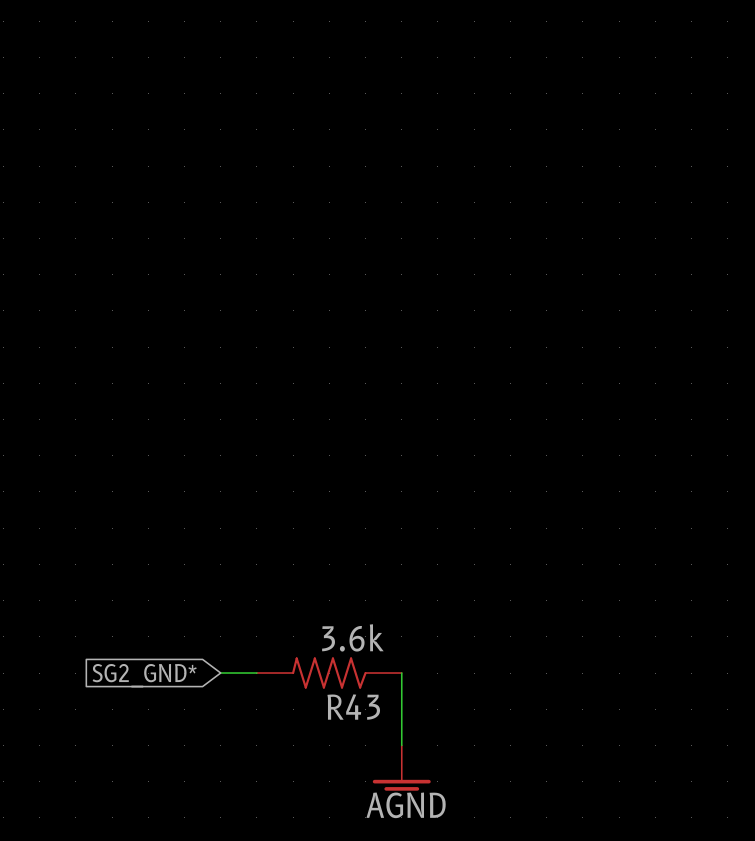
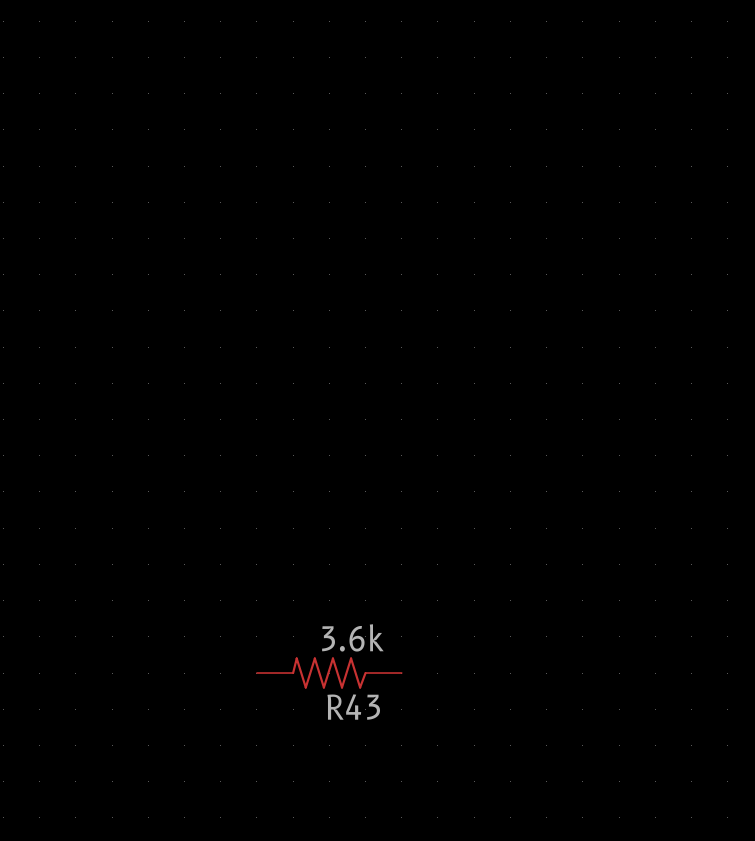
wire: (220, 673) (256, 673) -> none
wire: (401, 673) (401, 745) -> none
global label: SG2_GND* (144, 675) -> none
power symbol: AGND (401, 768) -> none

